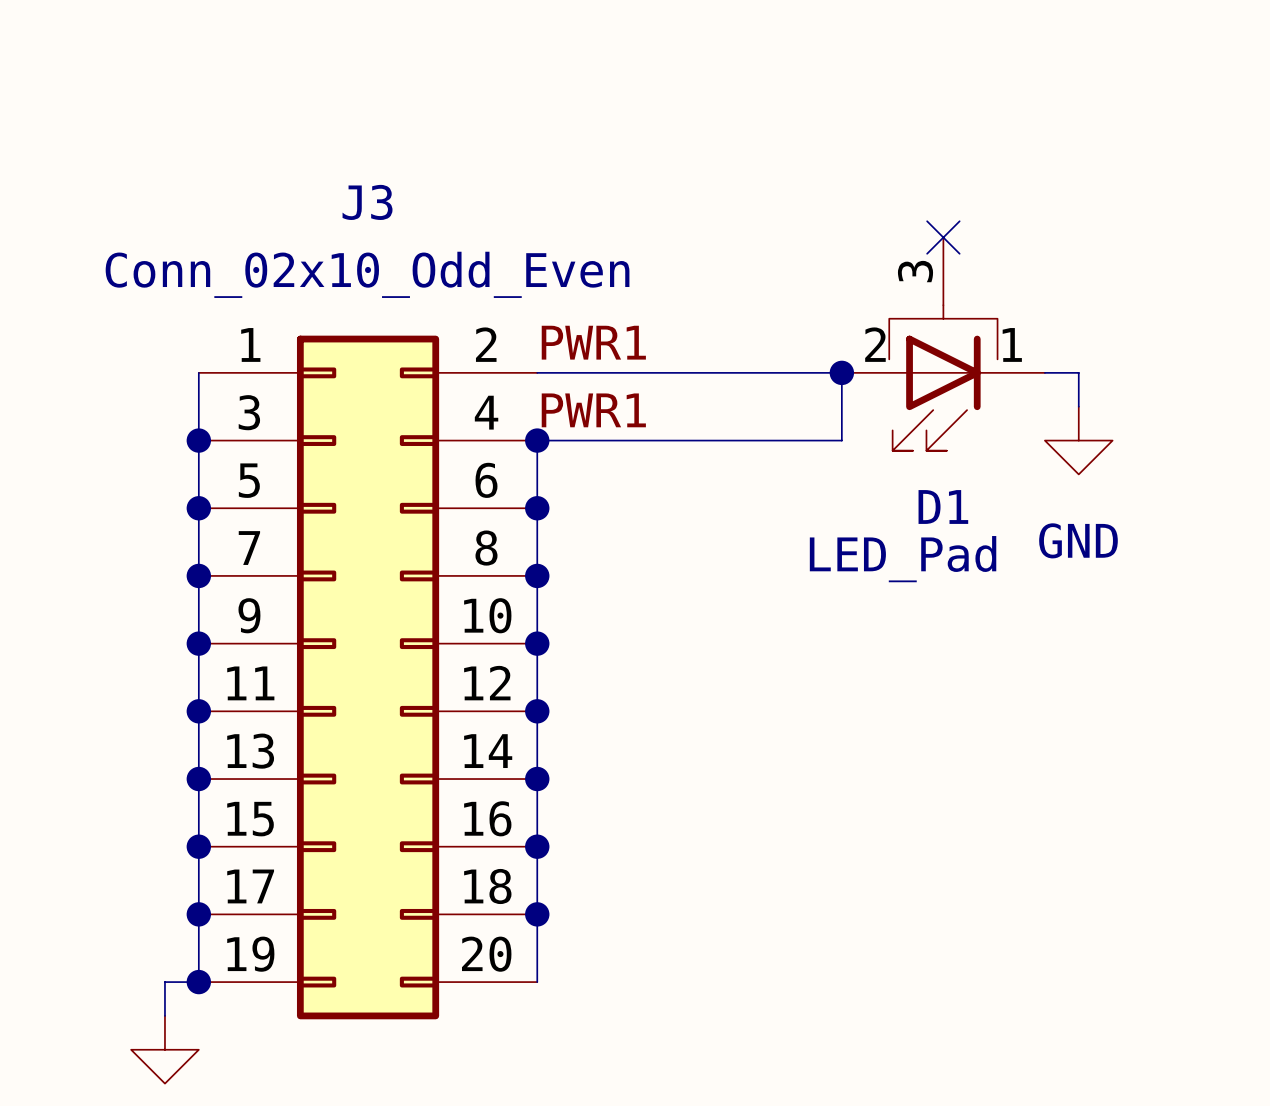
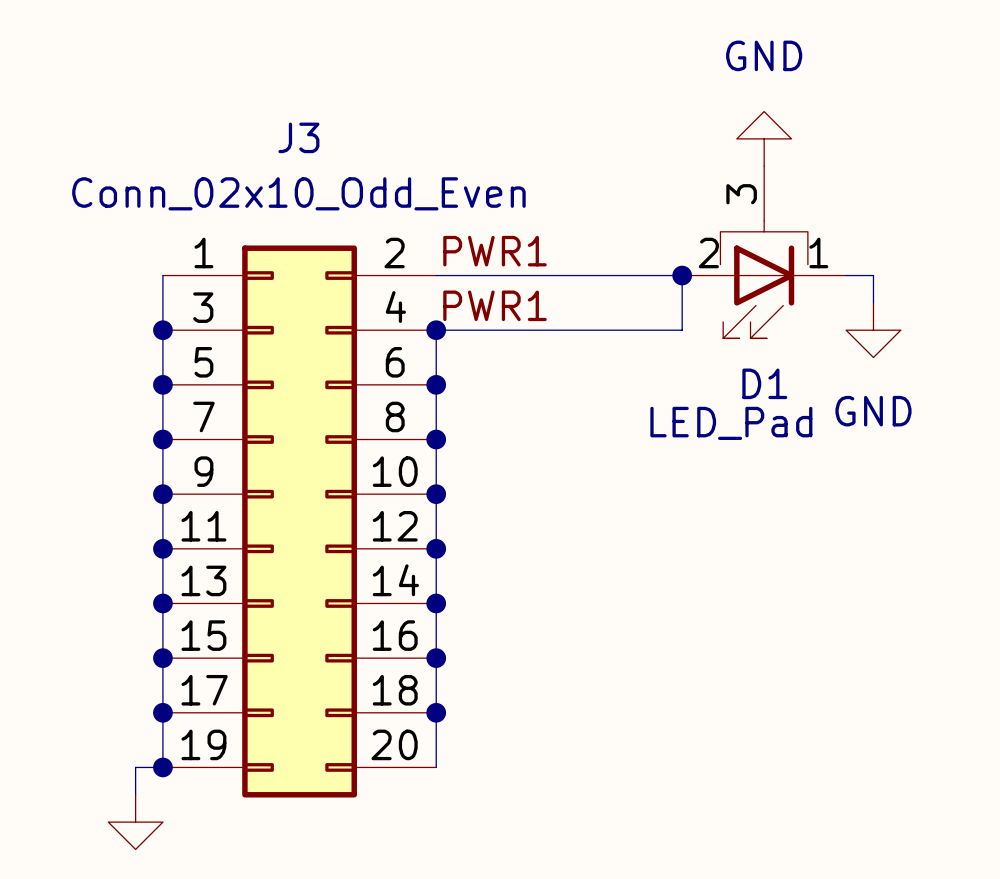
power symbol: none -> GND (764, 138)
no-connect mark: (943, 237) -> none

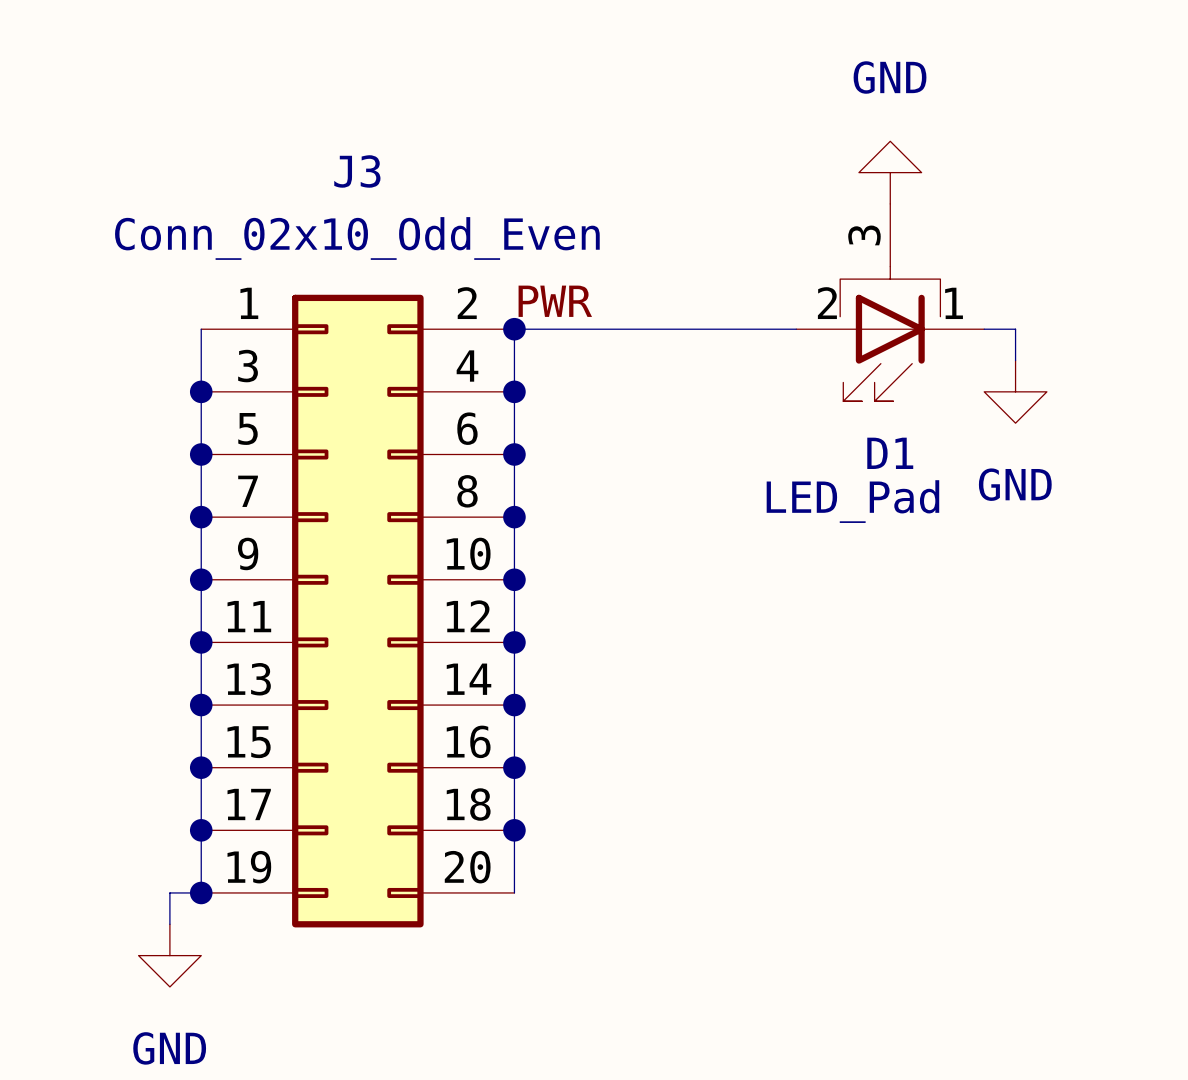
label: PWR1 (494, 251) -> PWR (555, 301)
junction: none -> (514, 329)
wire: (682, 275) (682, 330) (436, 330) -> (514, 329) (514, 391)
junction: (682, 275) -> none
label: PWR1 (494, 305) -> none

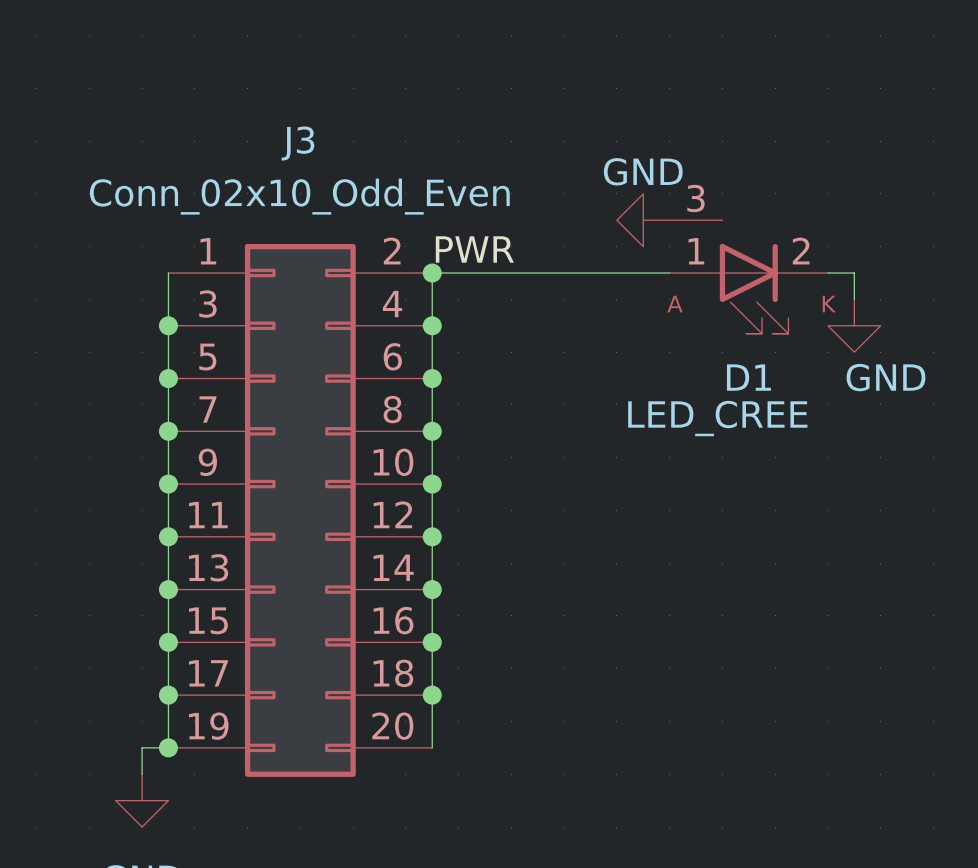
power symbol rotation: 0° (890, 172) -> 90° counterclockwise (643, 220)
power symbol position: GND (890, 172) -> GND (643, 220)
D1 symbol: [796, 203, 985, 402] -> [669, 220, 828, 334]
power symbol text position: GND (1015, 484) -> GND (885, 377)
D1 value: LED_Pad (852, 501) -> LED_CREE (717, 418)

